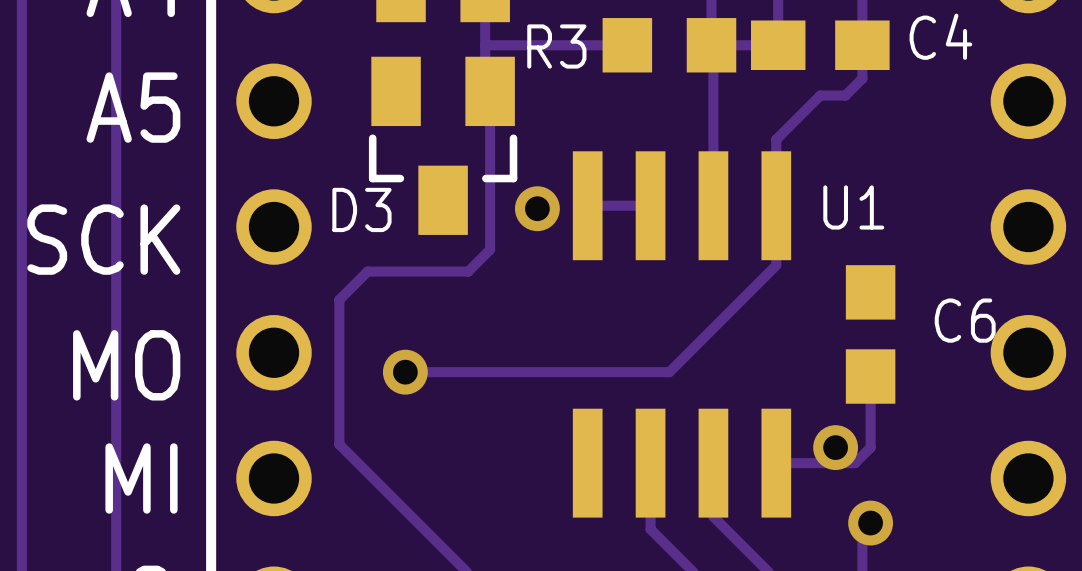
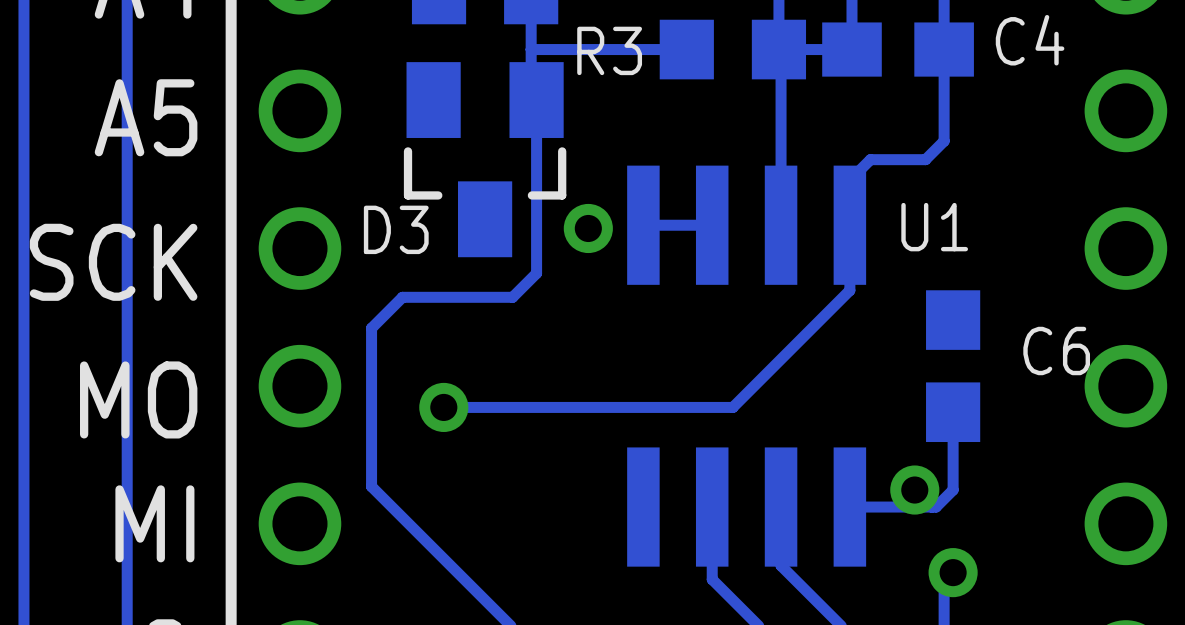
track: (862, 78) (845, 95) (820, 95) (776, 139) (776, 164) -> (944, 86) (944, 141) (925, 159) (870, 159) (849, 180)

